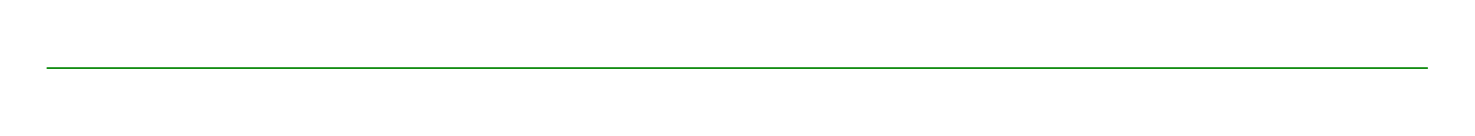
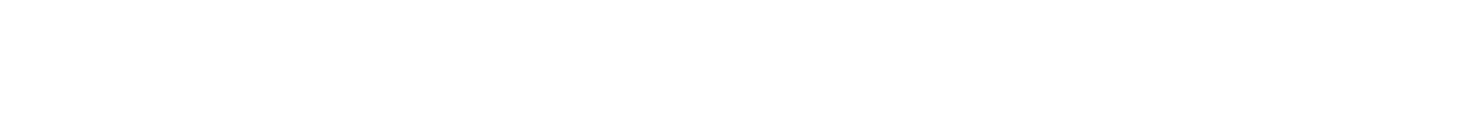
wire: (47, 68) (1427, 68) -> none

